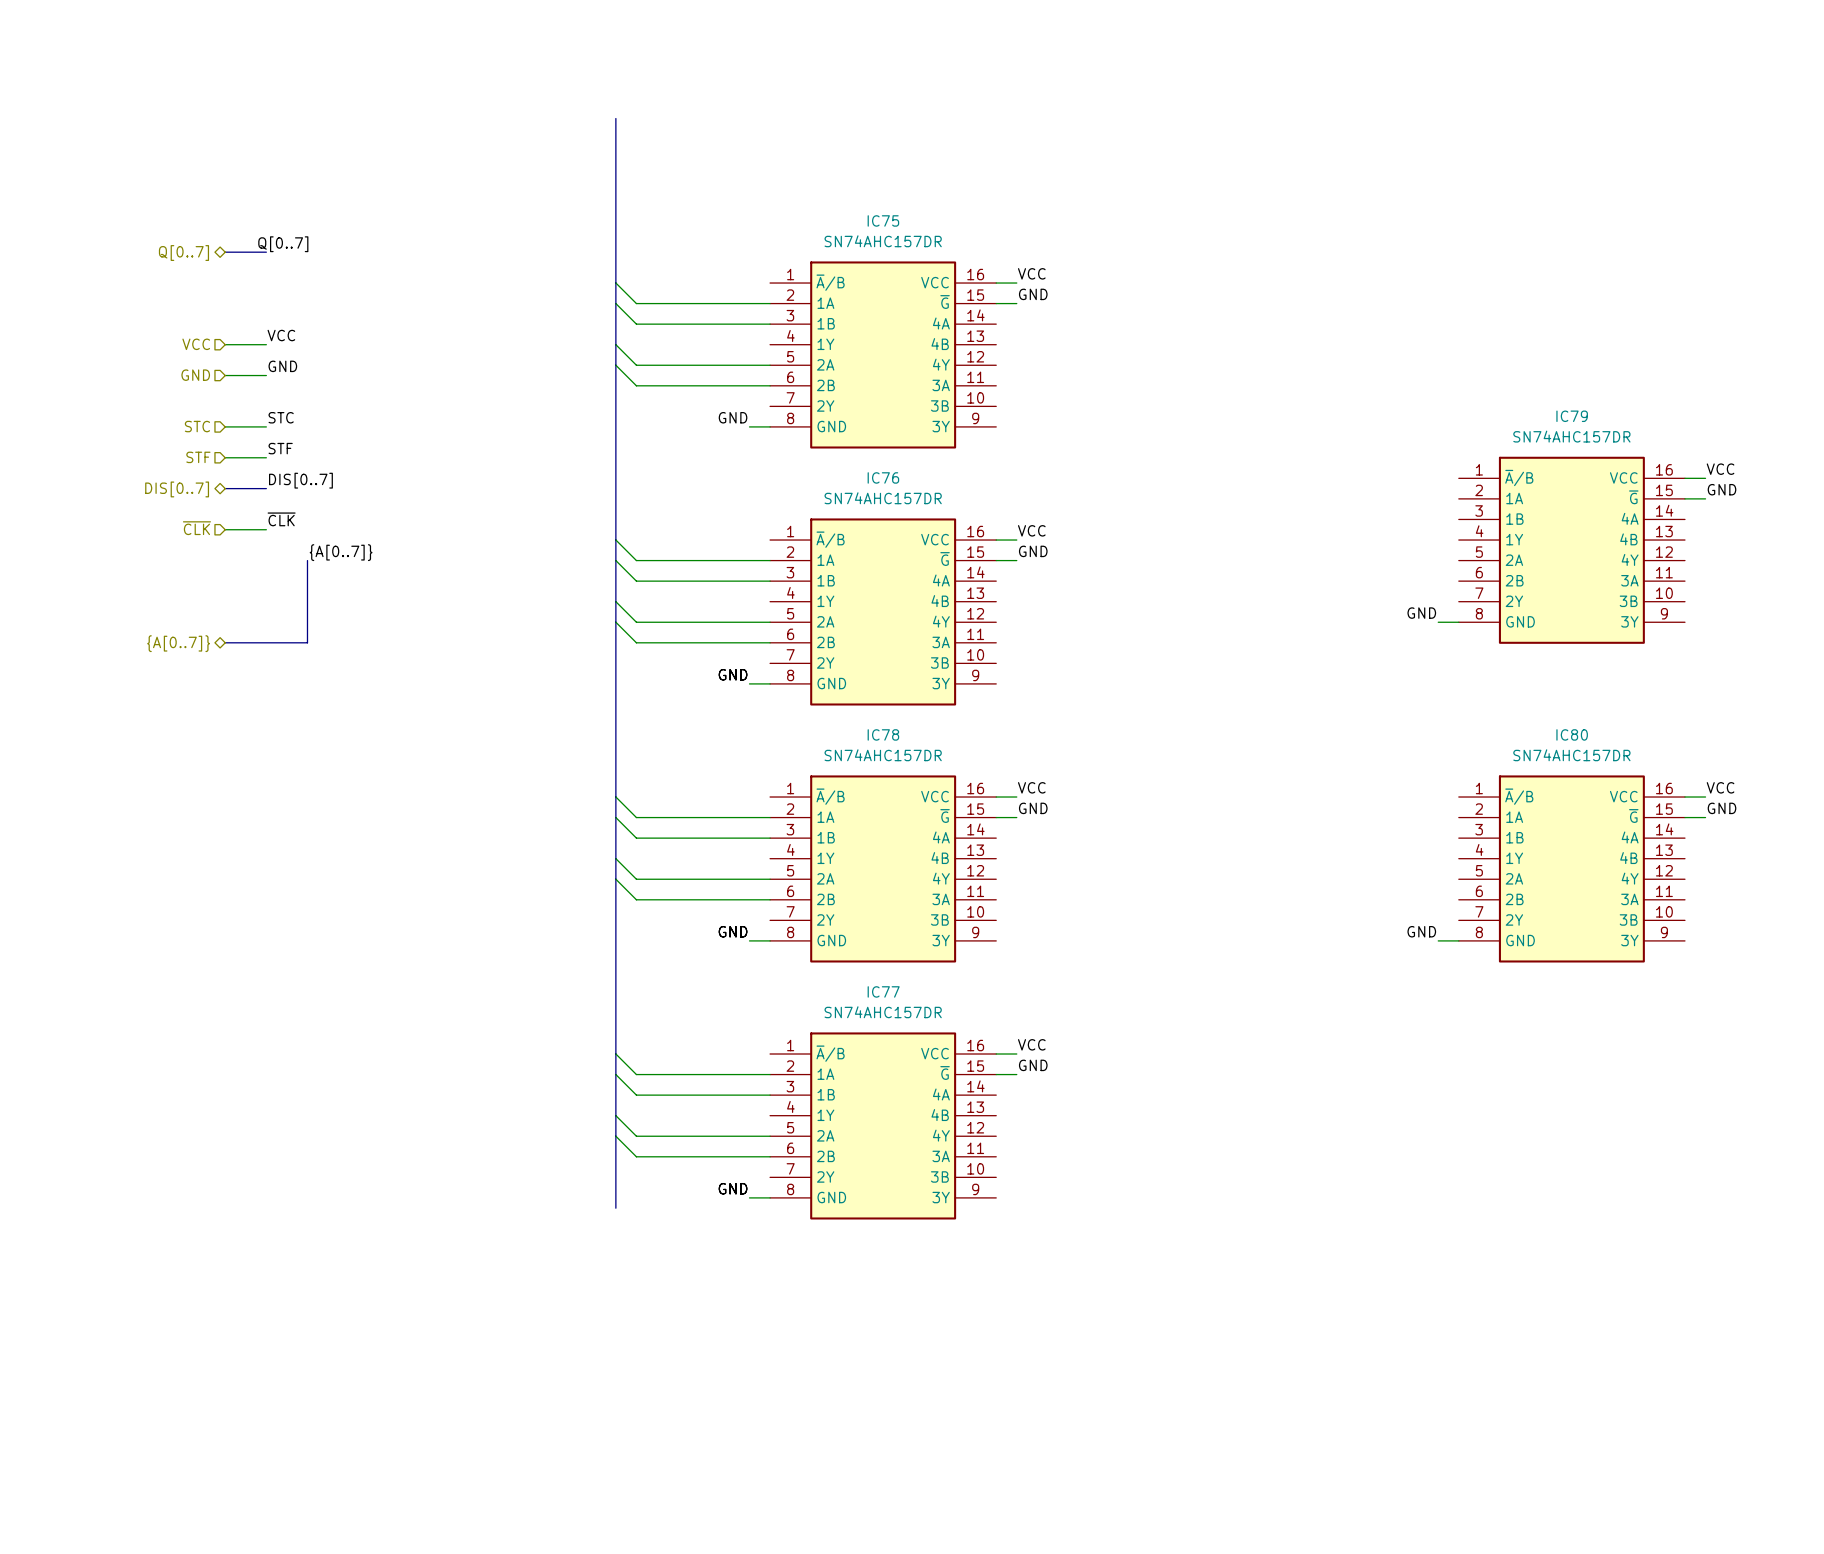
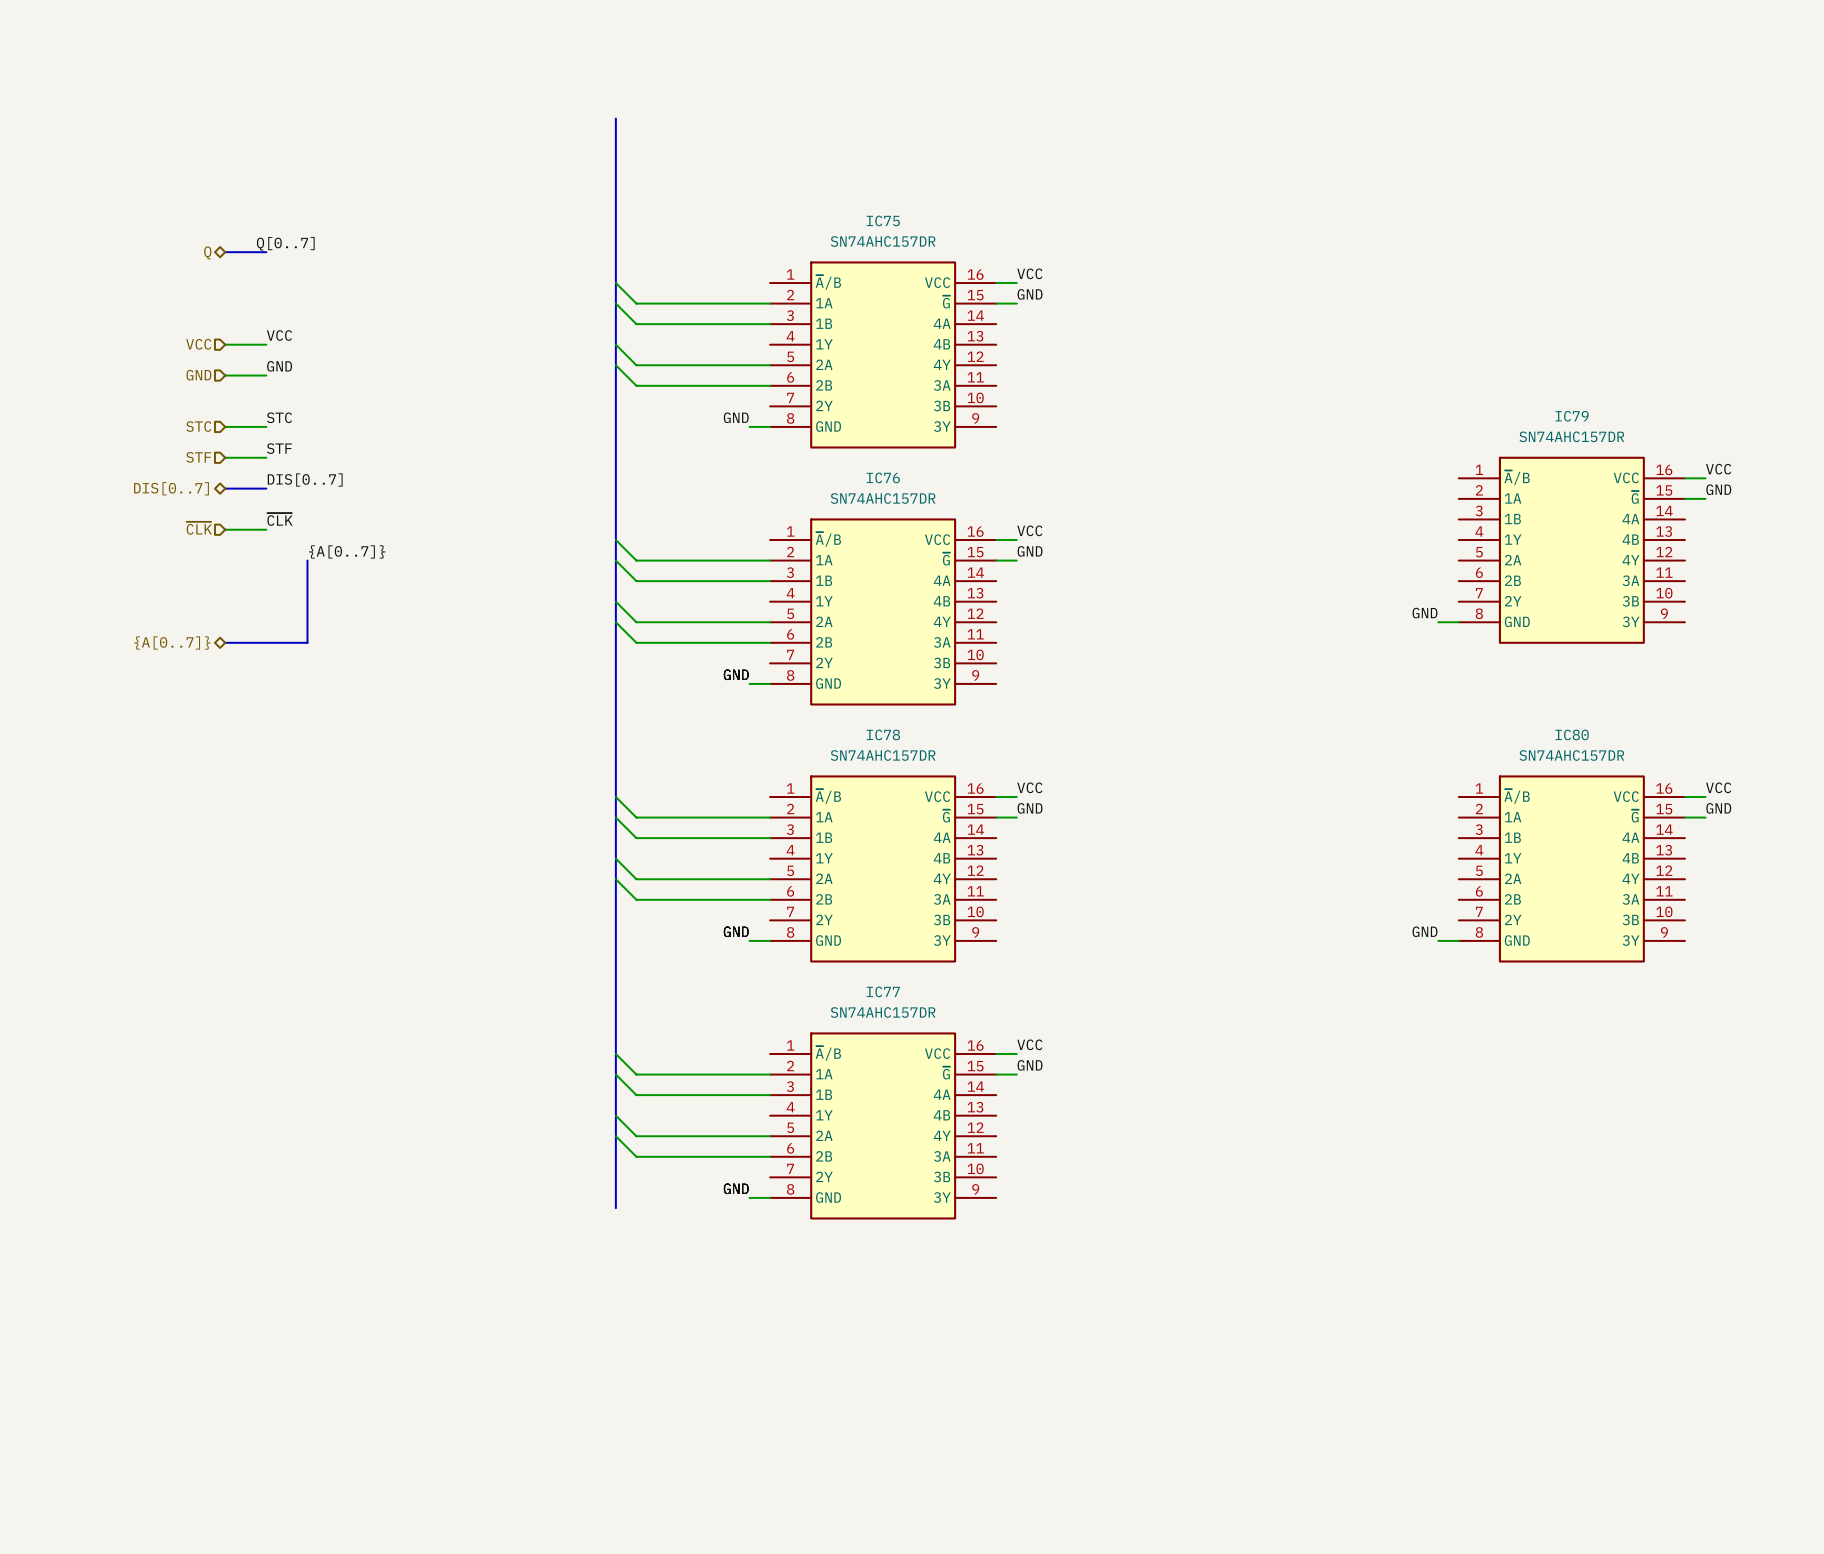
hierarchical label: Q[0..7] (183, 253) -> Q (207, 252)

